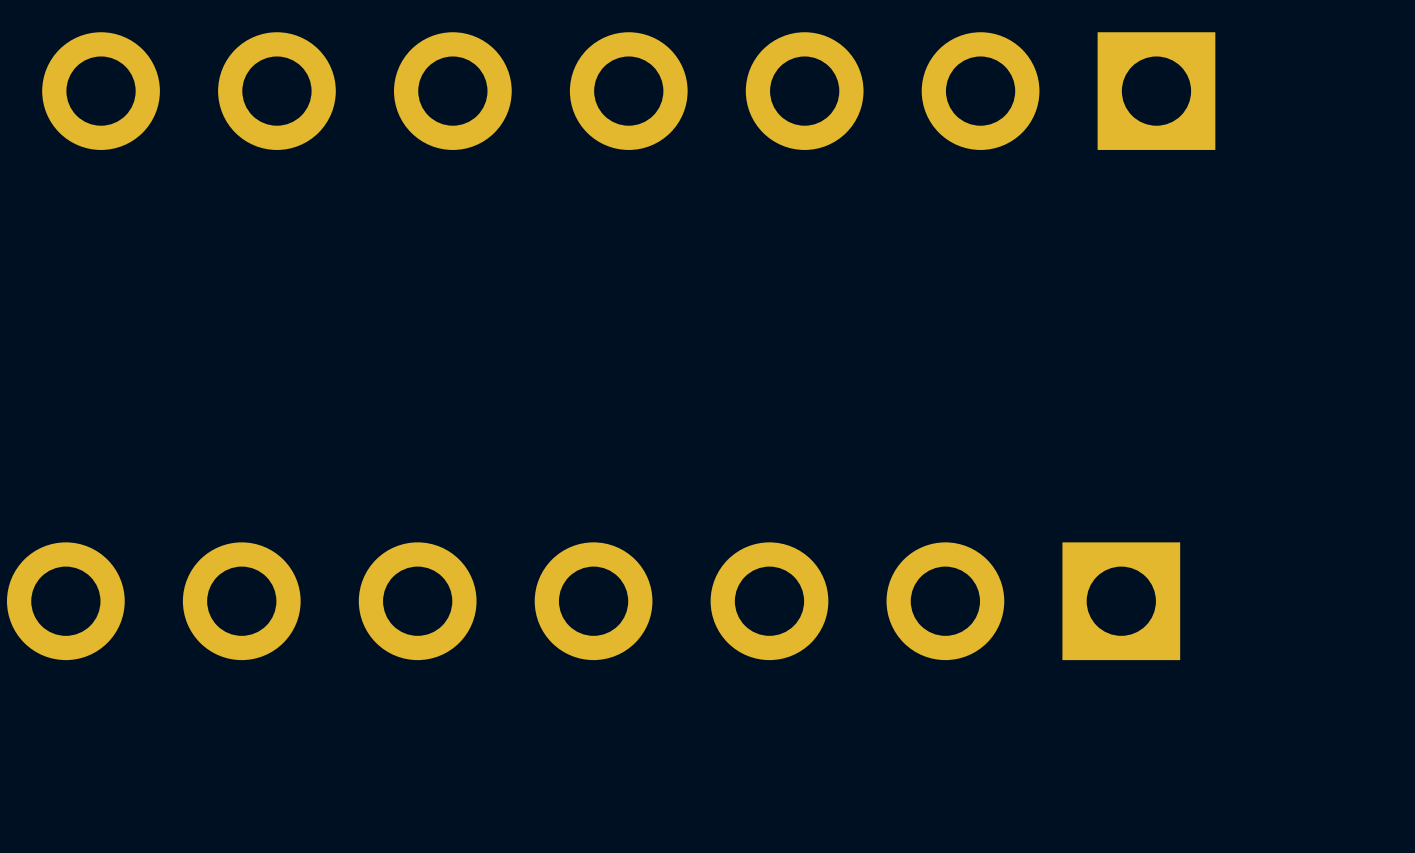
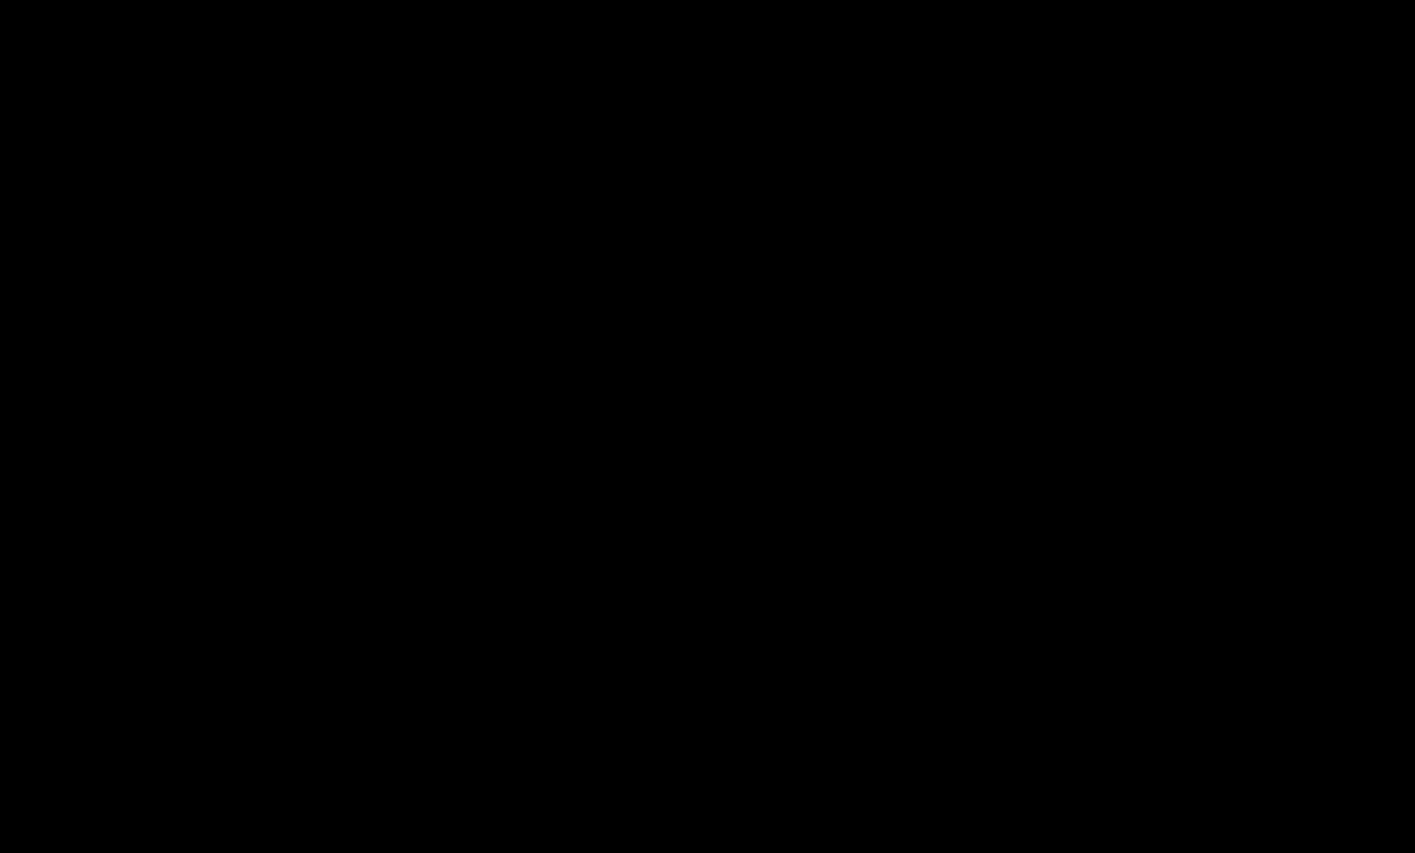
part: (628, 91) -> none
part: (593, 601) -> none

